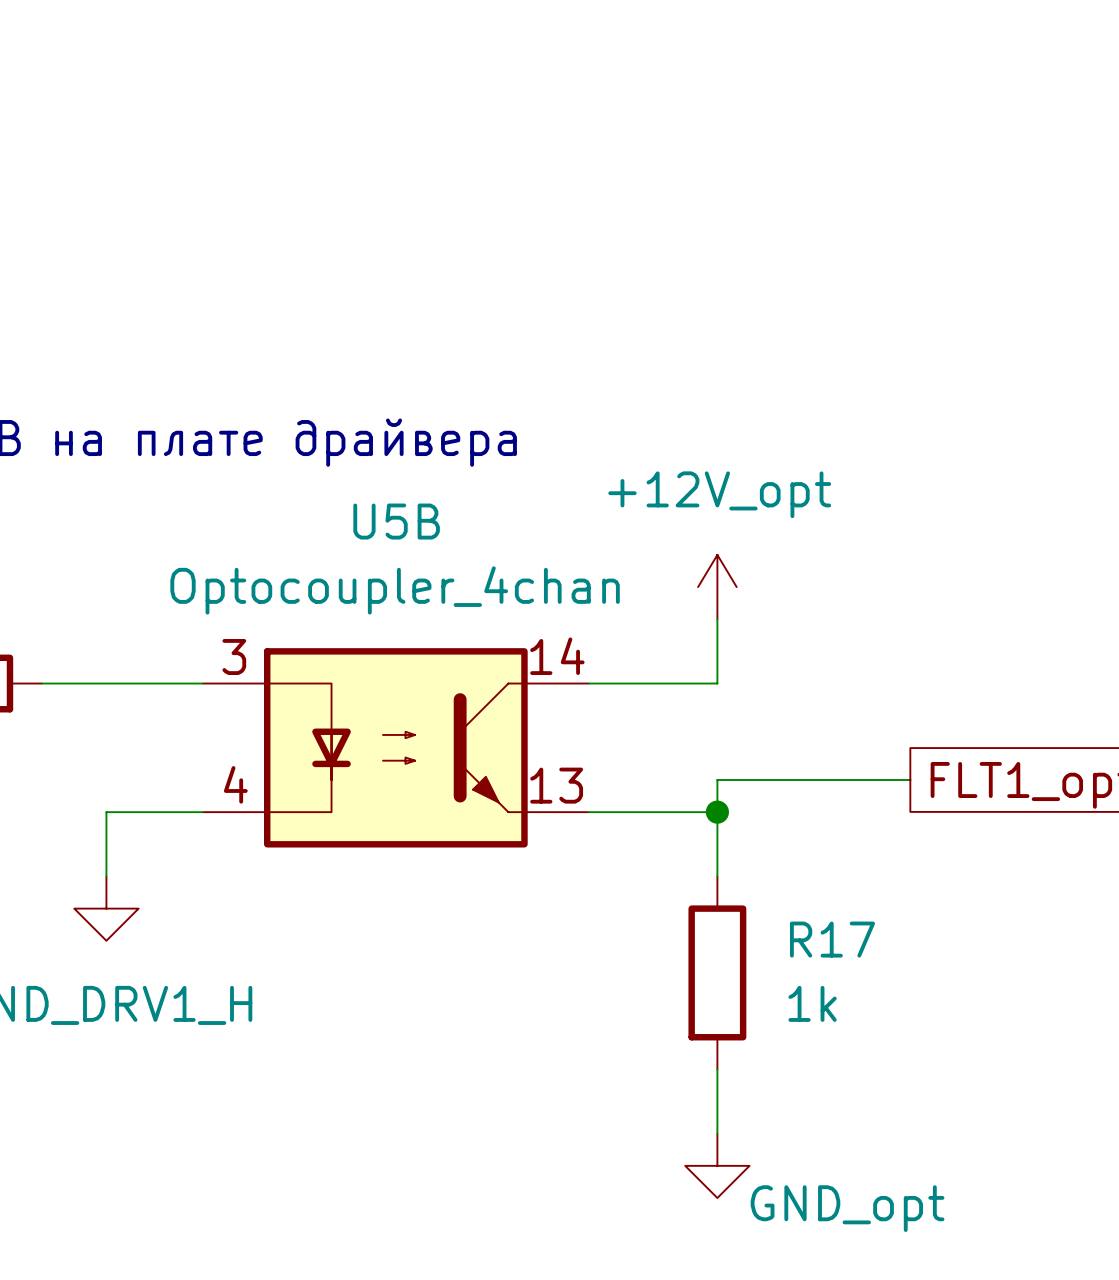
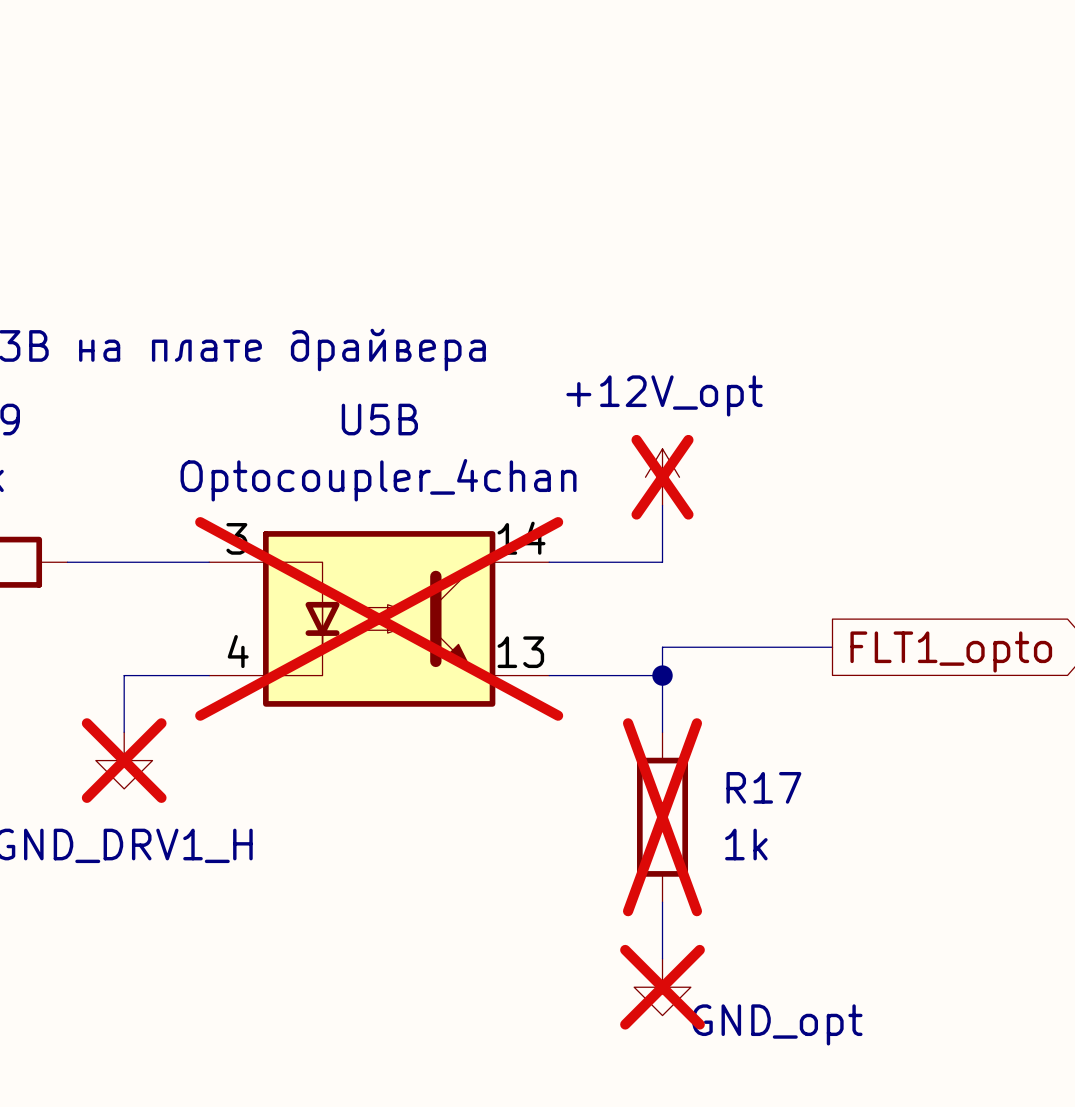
power symbol do-not-place cross: none -> (662, 477)
U5B do-not-place cross: none -> (379, 618)
power symbol do-not-place cross: none -> (124, 760)
R17 do-not-place cross: none -> (662, 817)
power symbol do-not-place cross: none -> (662, 987)

